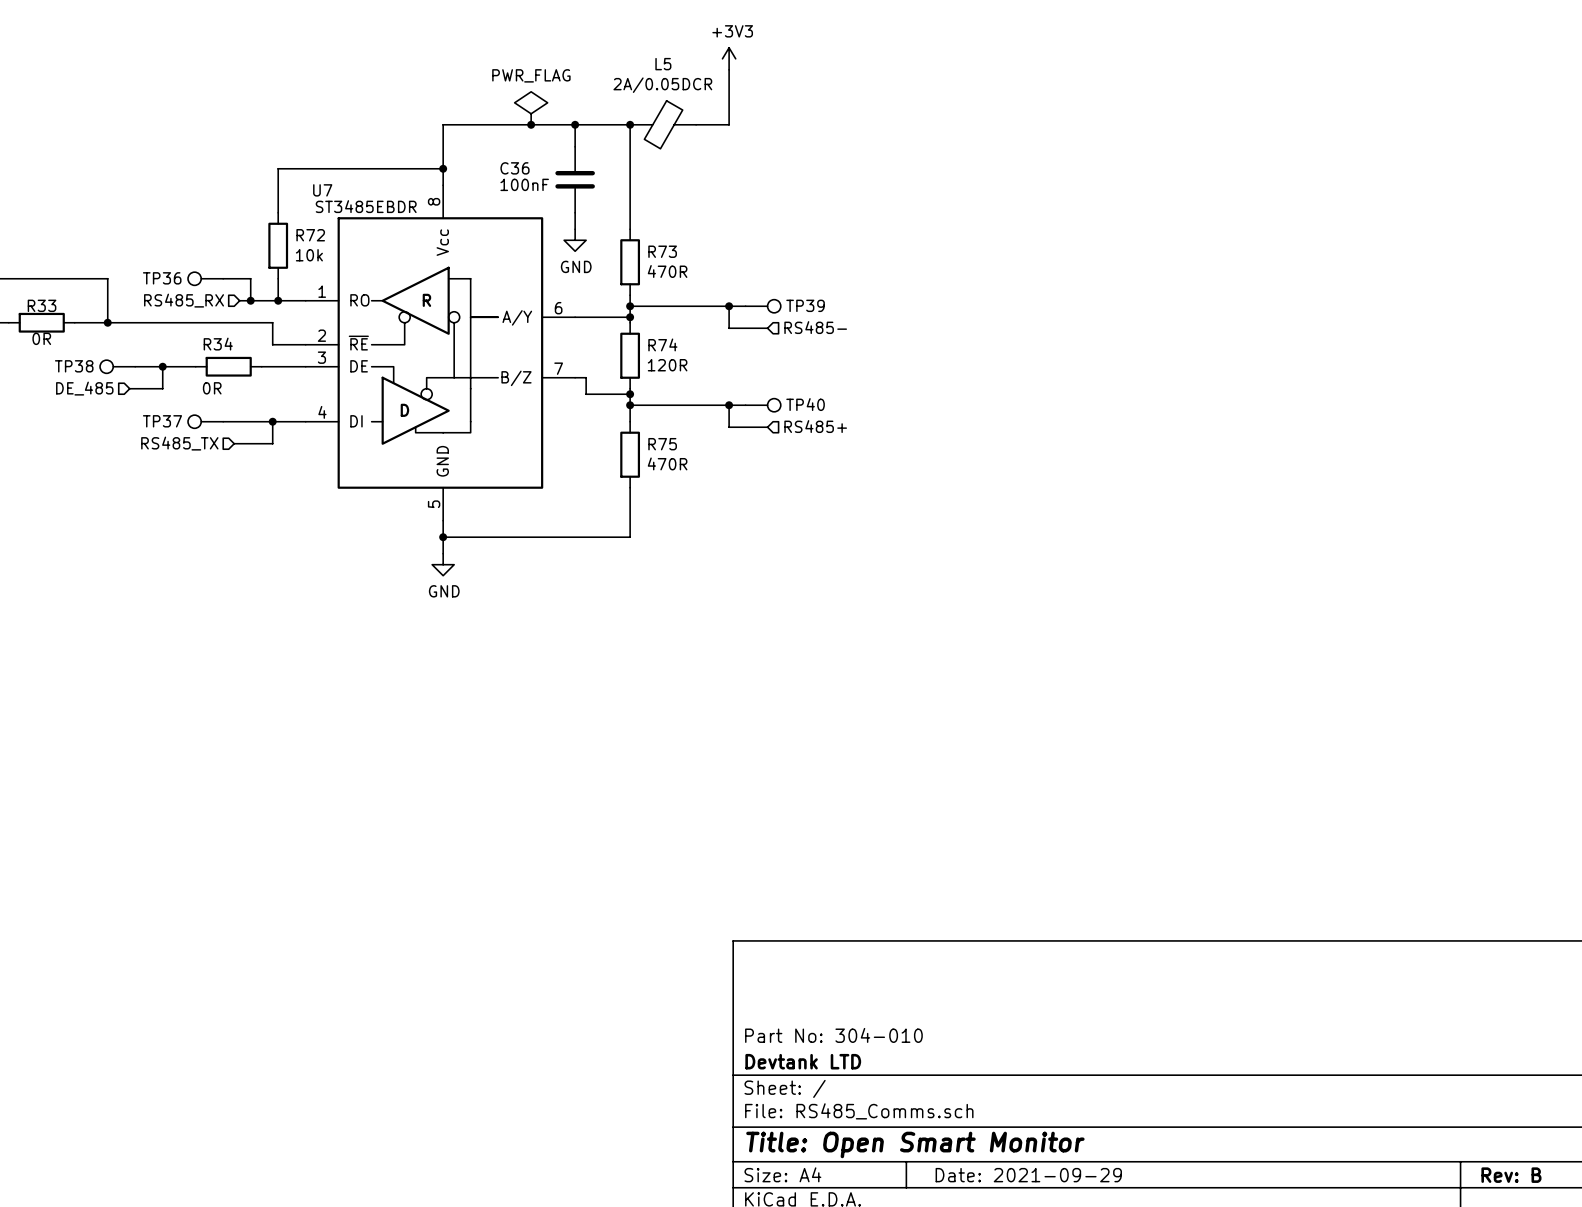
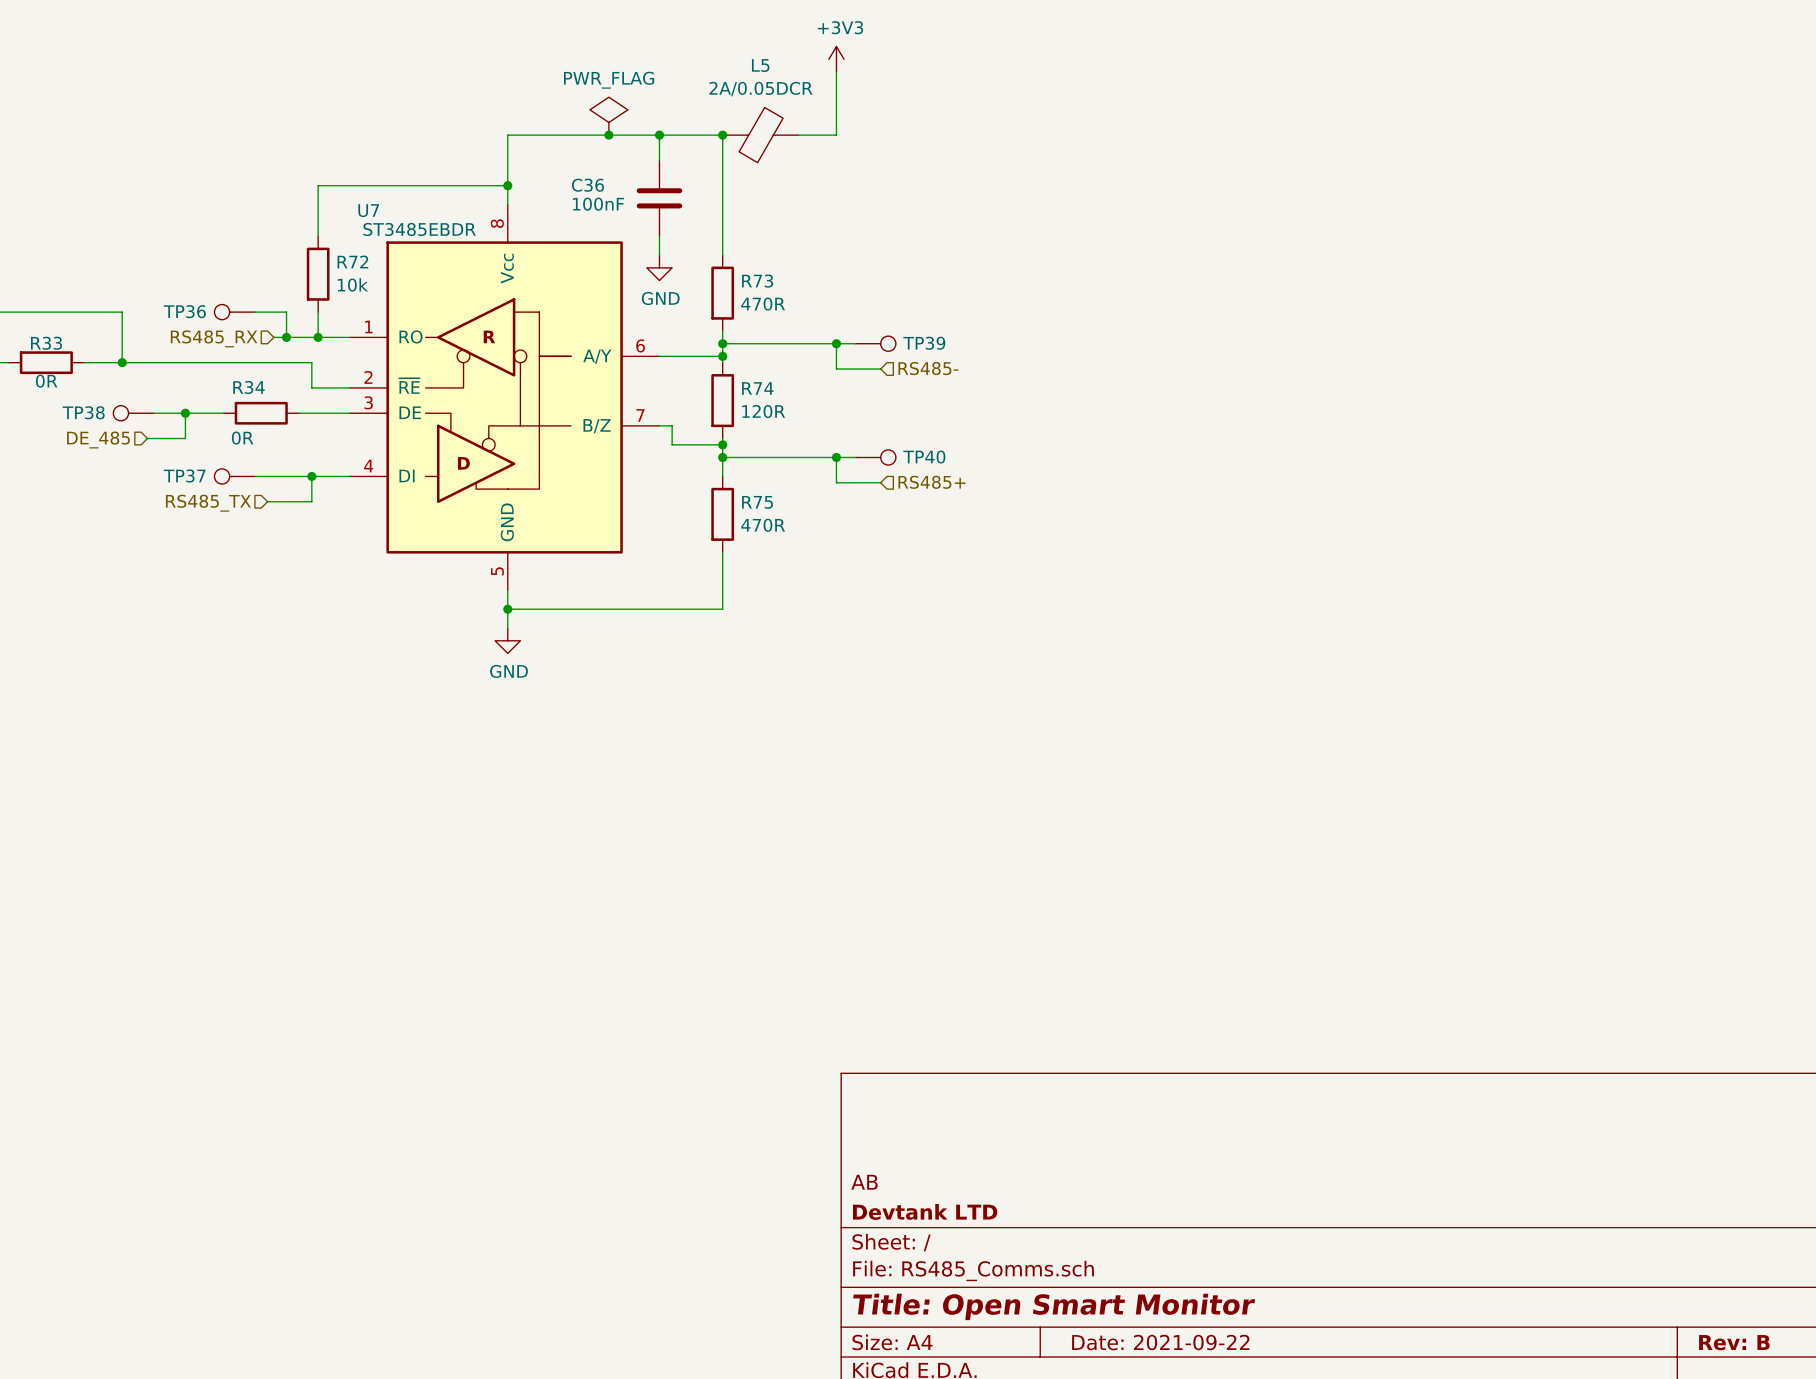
title block: Part No: 304-010 (833, 1035) -> AB (864, 1182)
title block: Date: 2021-09-29 (1028, 1175) -> Date: 2021-09-22 (1160, 1342)

